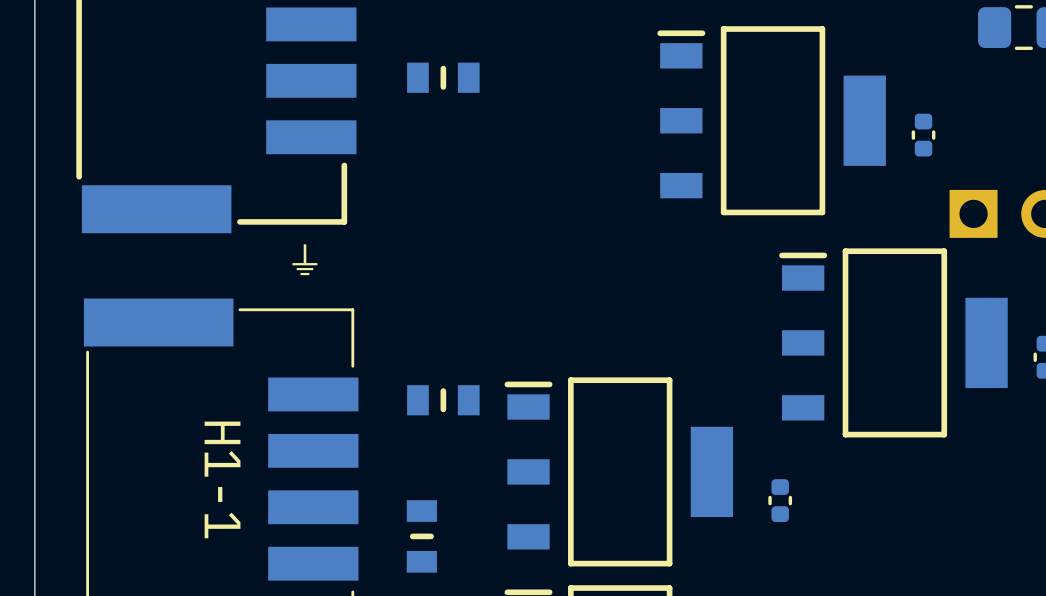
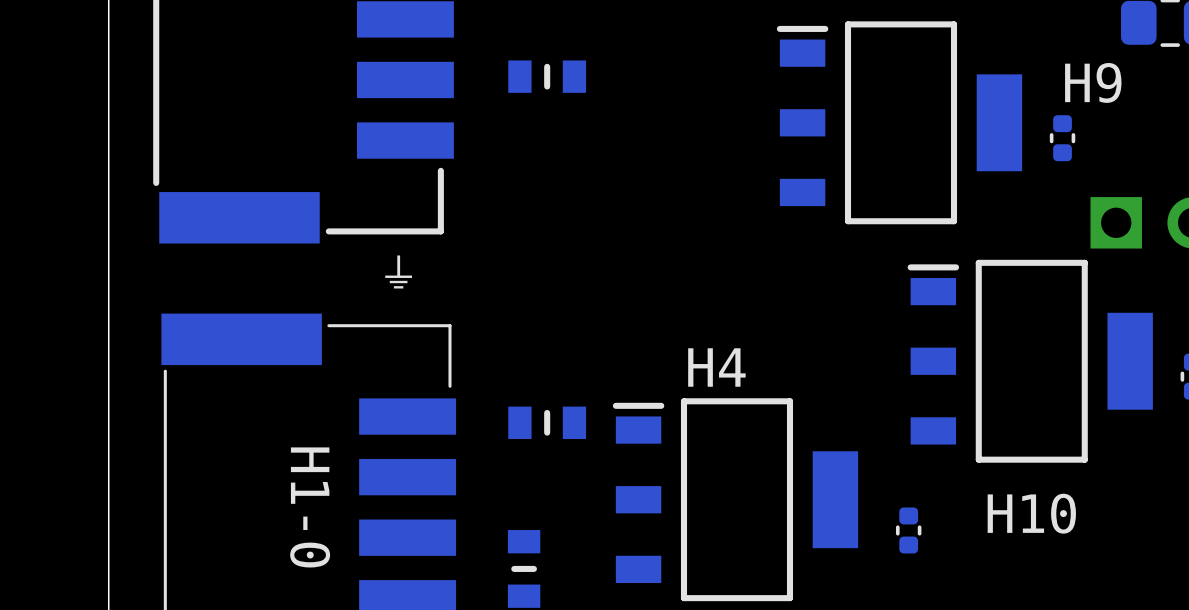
H9 name: none -> H9 (1093, 82)
H4 name: none -> H4 (716, 367)
H1-1 name: H1-1 (222, 479) -> H1-0 (310, 507)
H10 name: none -> H10 (1031, 513)

